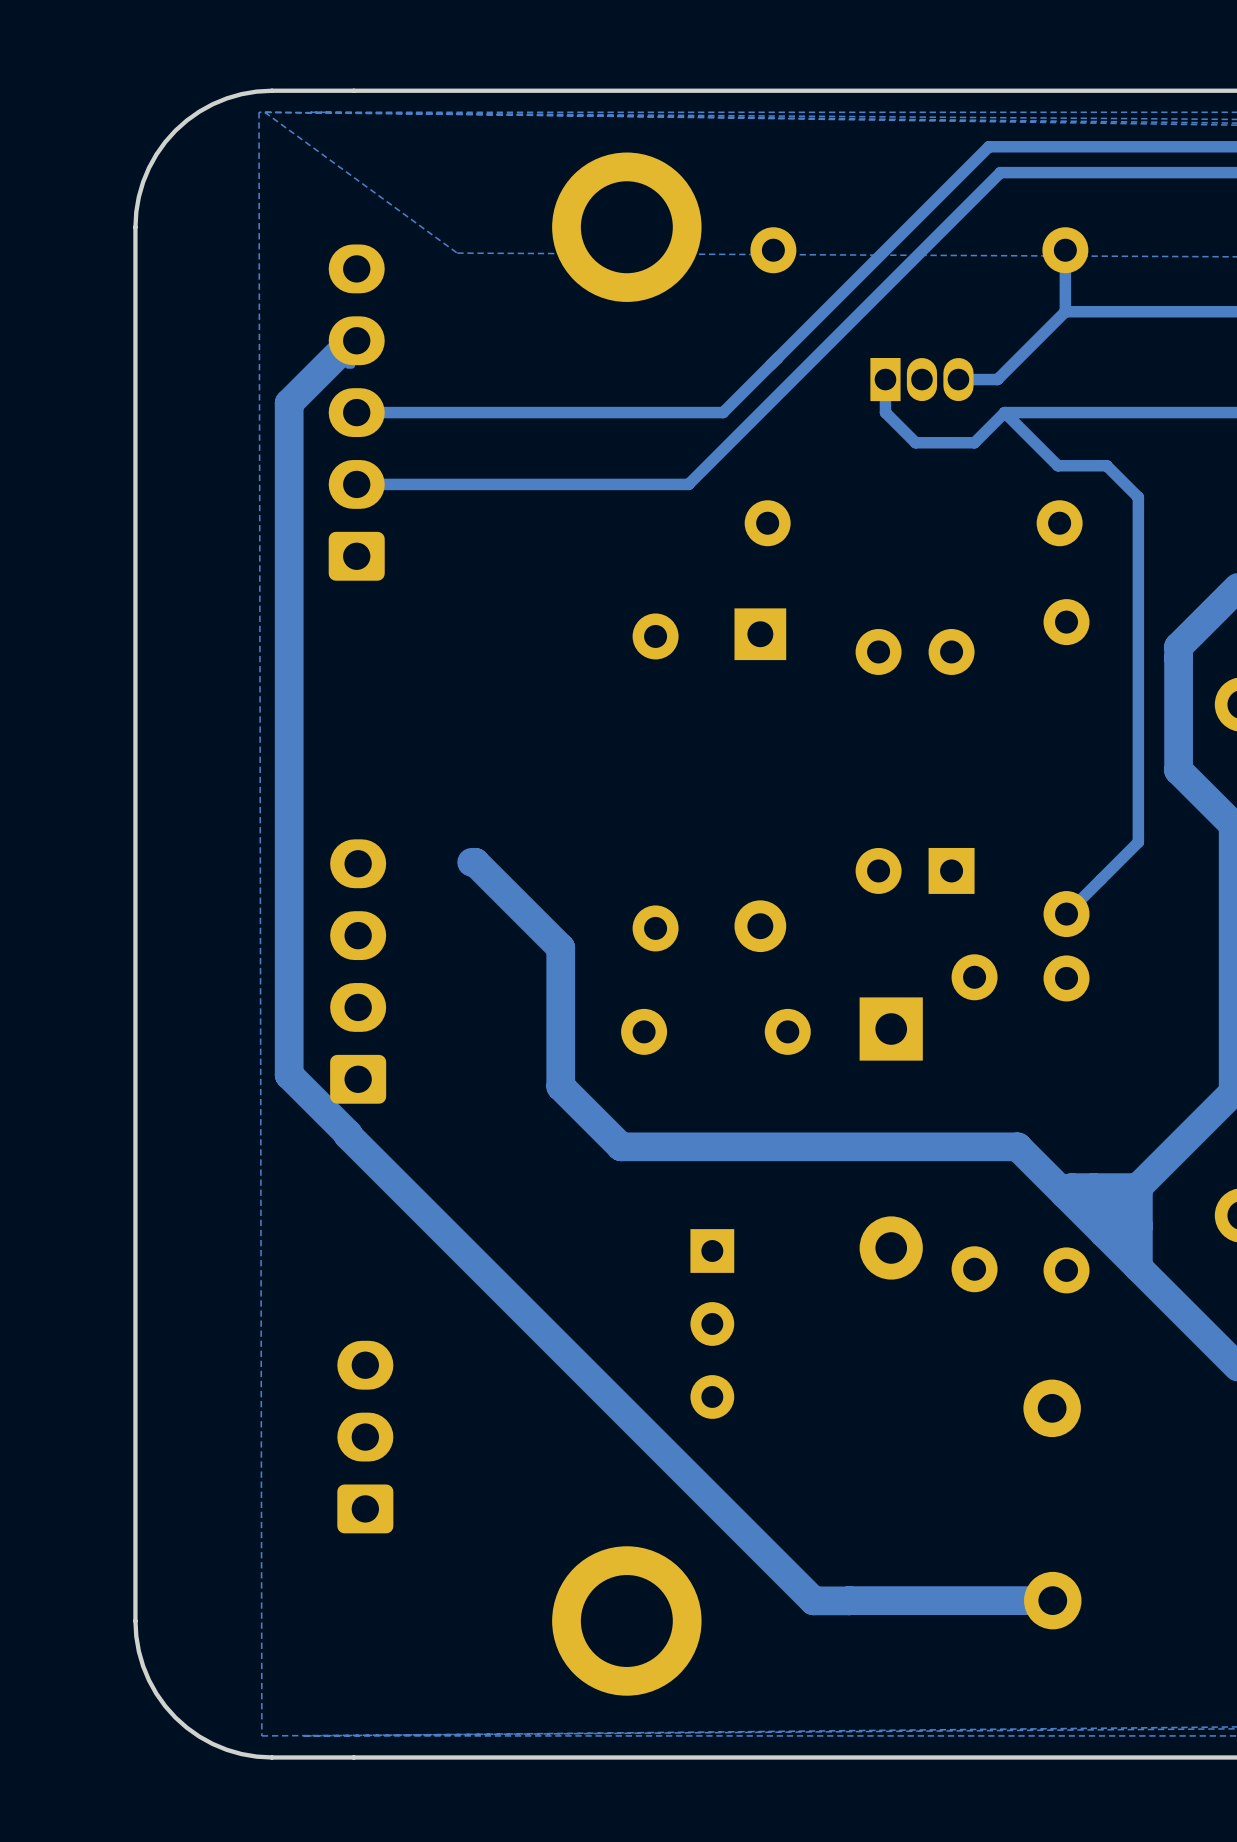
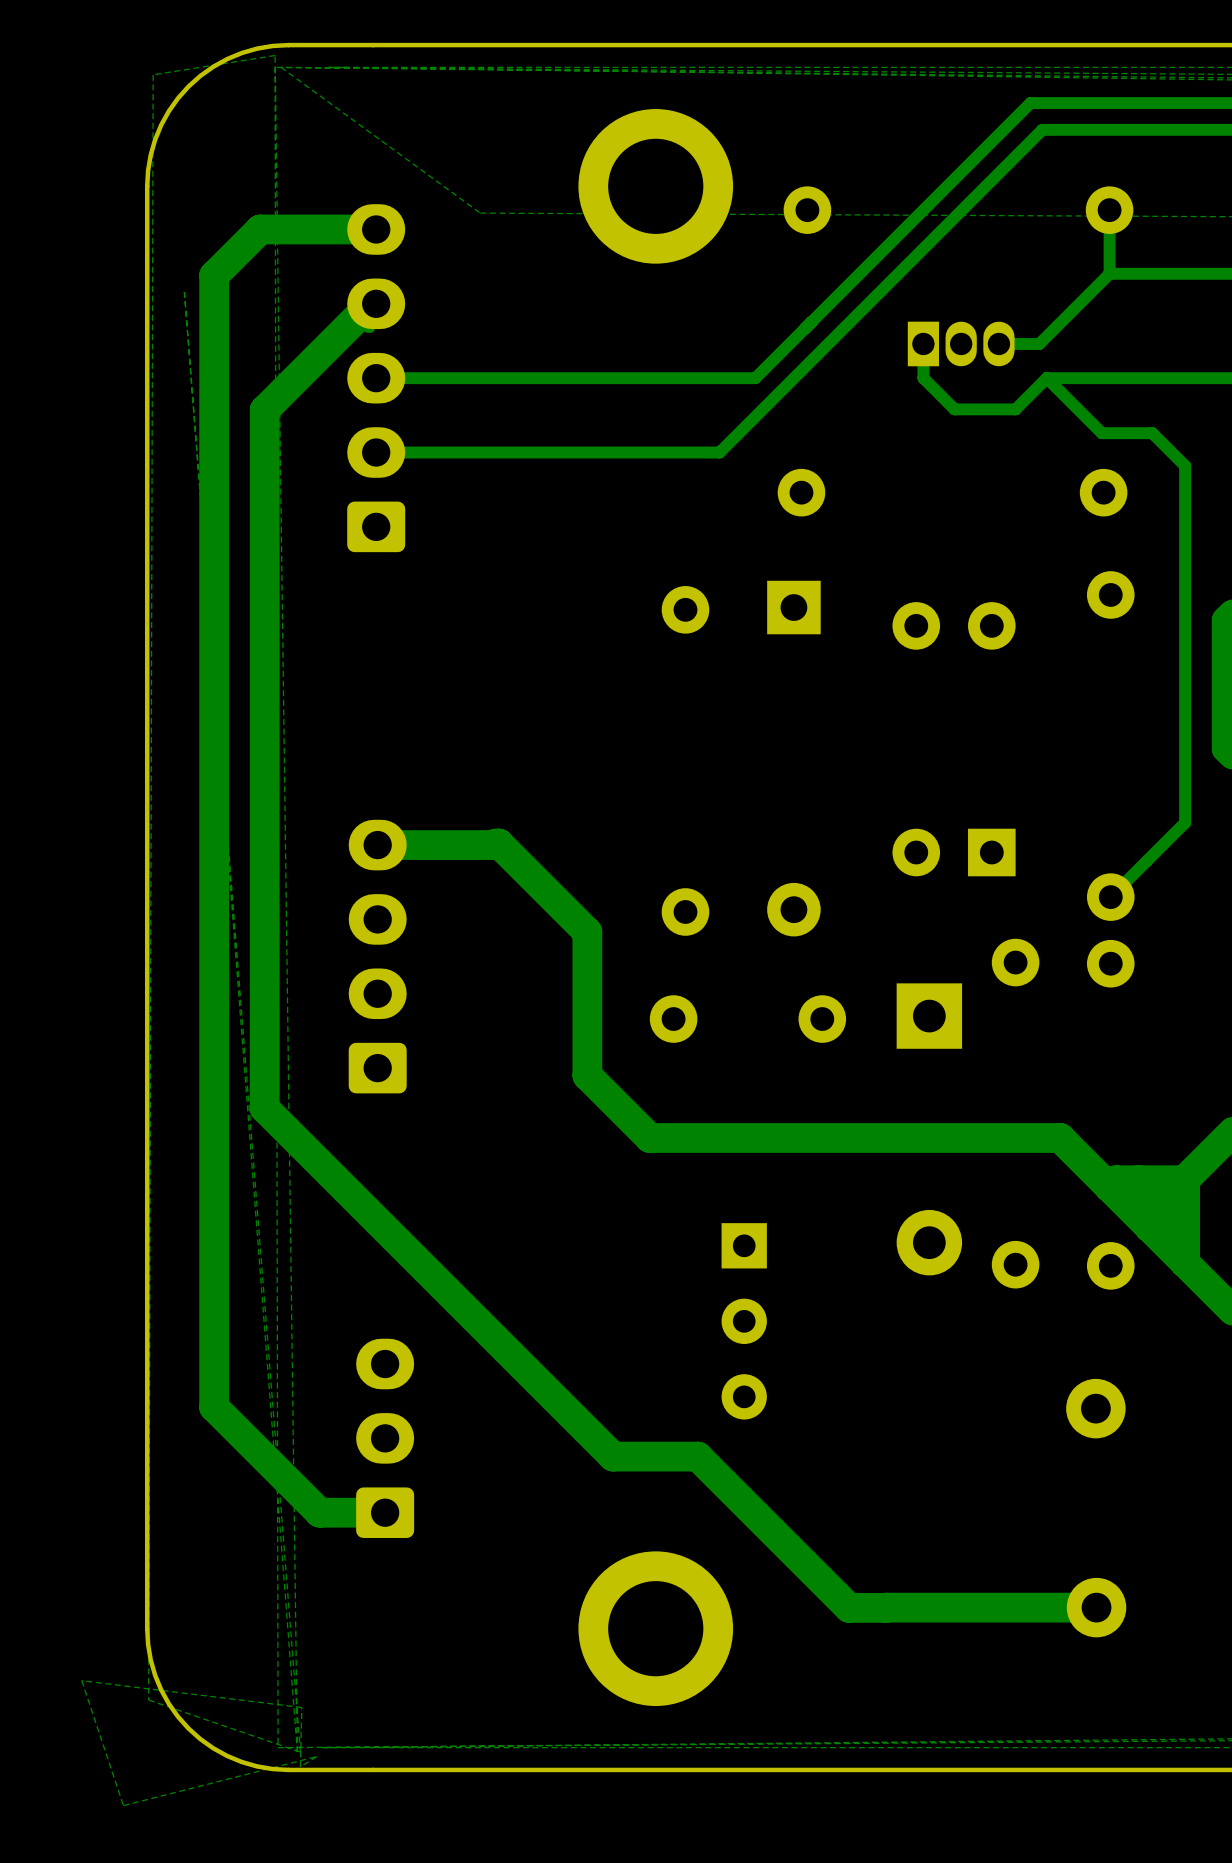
zone outline: none -> (275, 55) (297, 1752) (184, 291) (300, 1752) (148, 1700) (153, 74) (275, 55)
track: none -> (376, 229) (260, 229) (214, 275) (214, 1407) (319, 1512) (385, 1512)
track: (289, 403) (289, 1074) (667, 1454) -> (306, 368) (264, 410) (264, 1108) (613, 1456) (697, 1456)
track: none -> (498, 843) (377, 845)
zone outline: none -> (81, 1680) (301, 1707) (300, 1766) (316, 1756) (123, 1805) (81, 1680)

